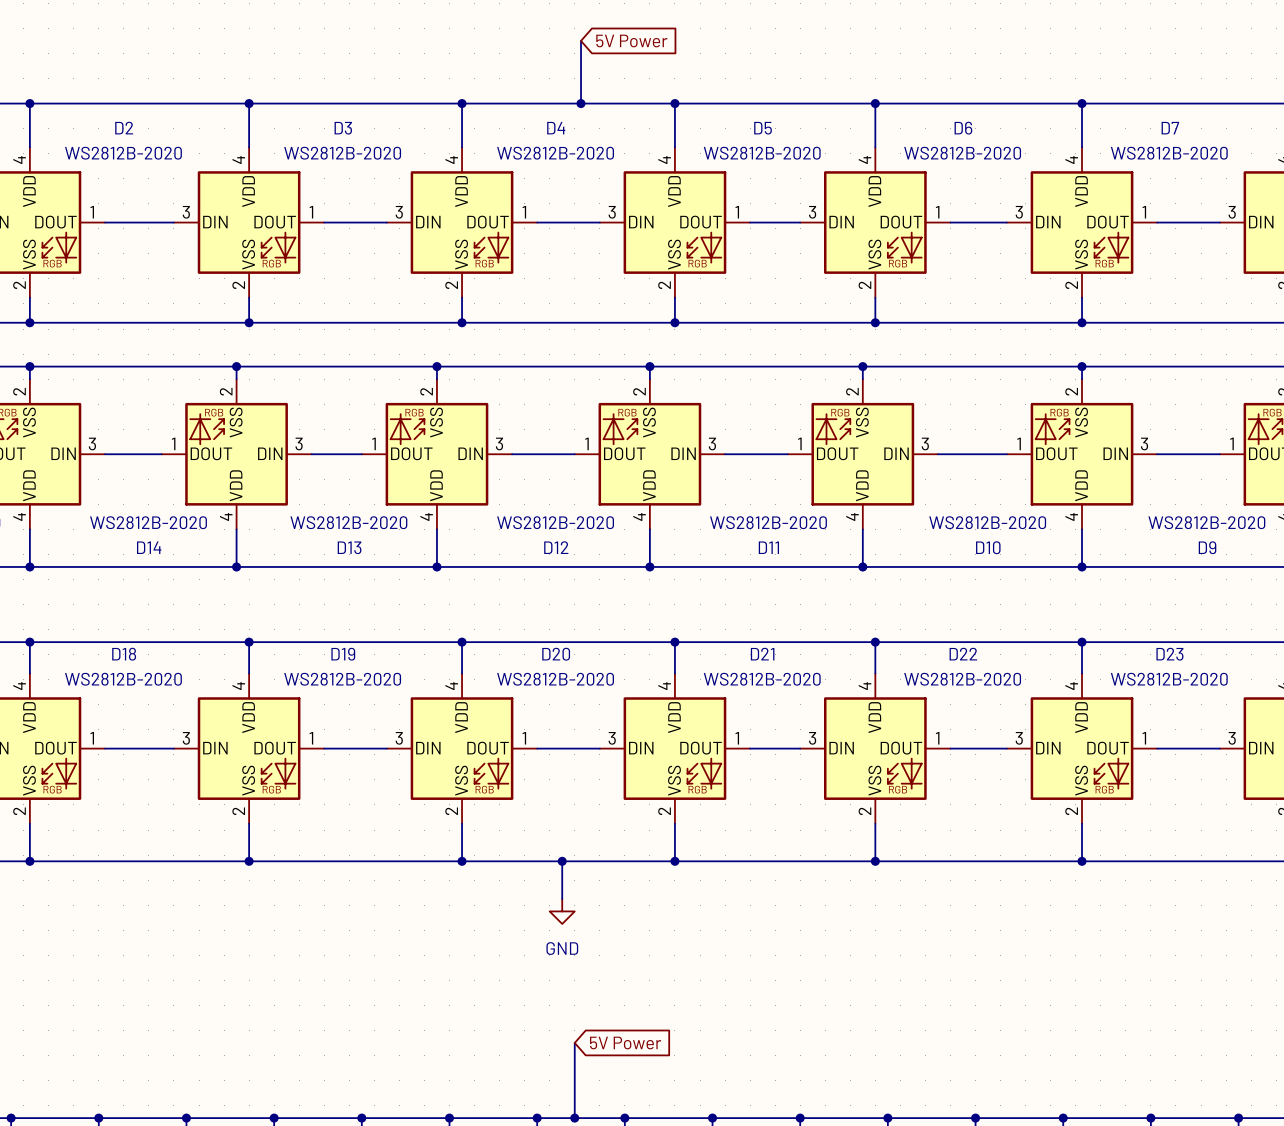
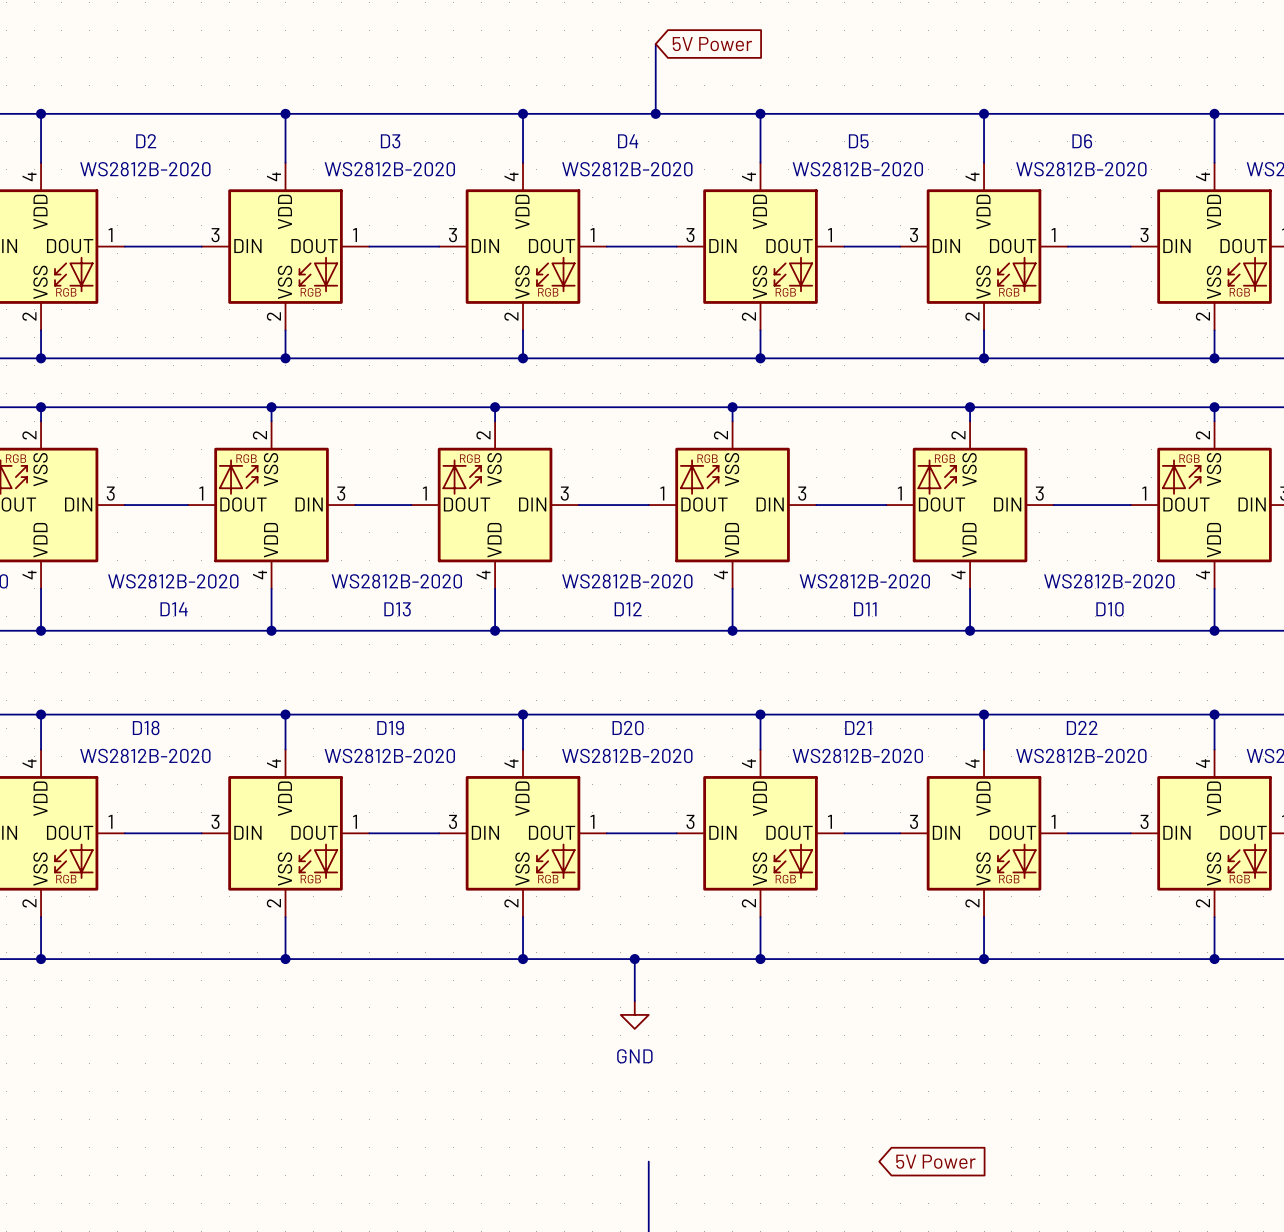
global label position: 5V Power (625, 1043) -> 5V Power (935, 1161)

